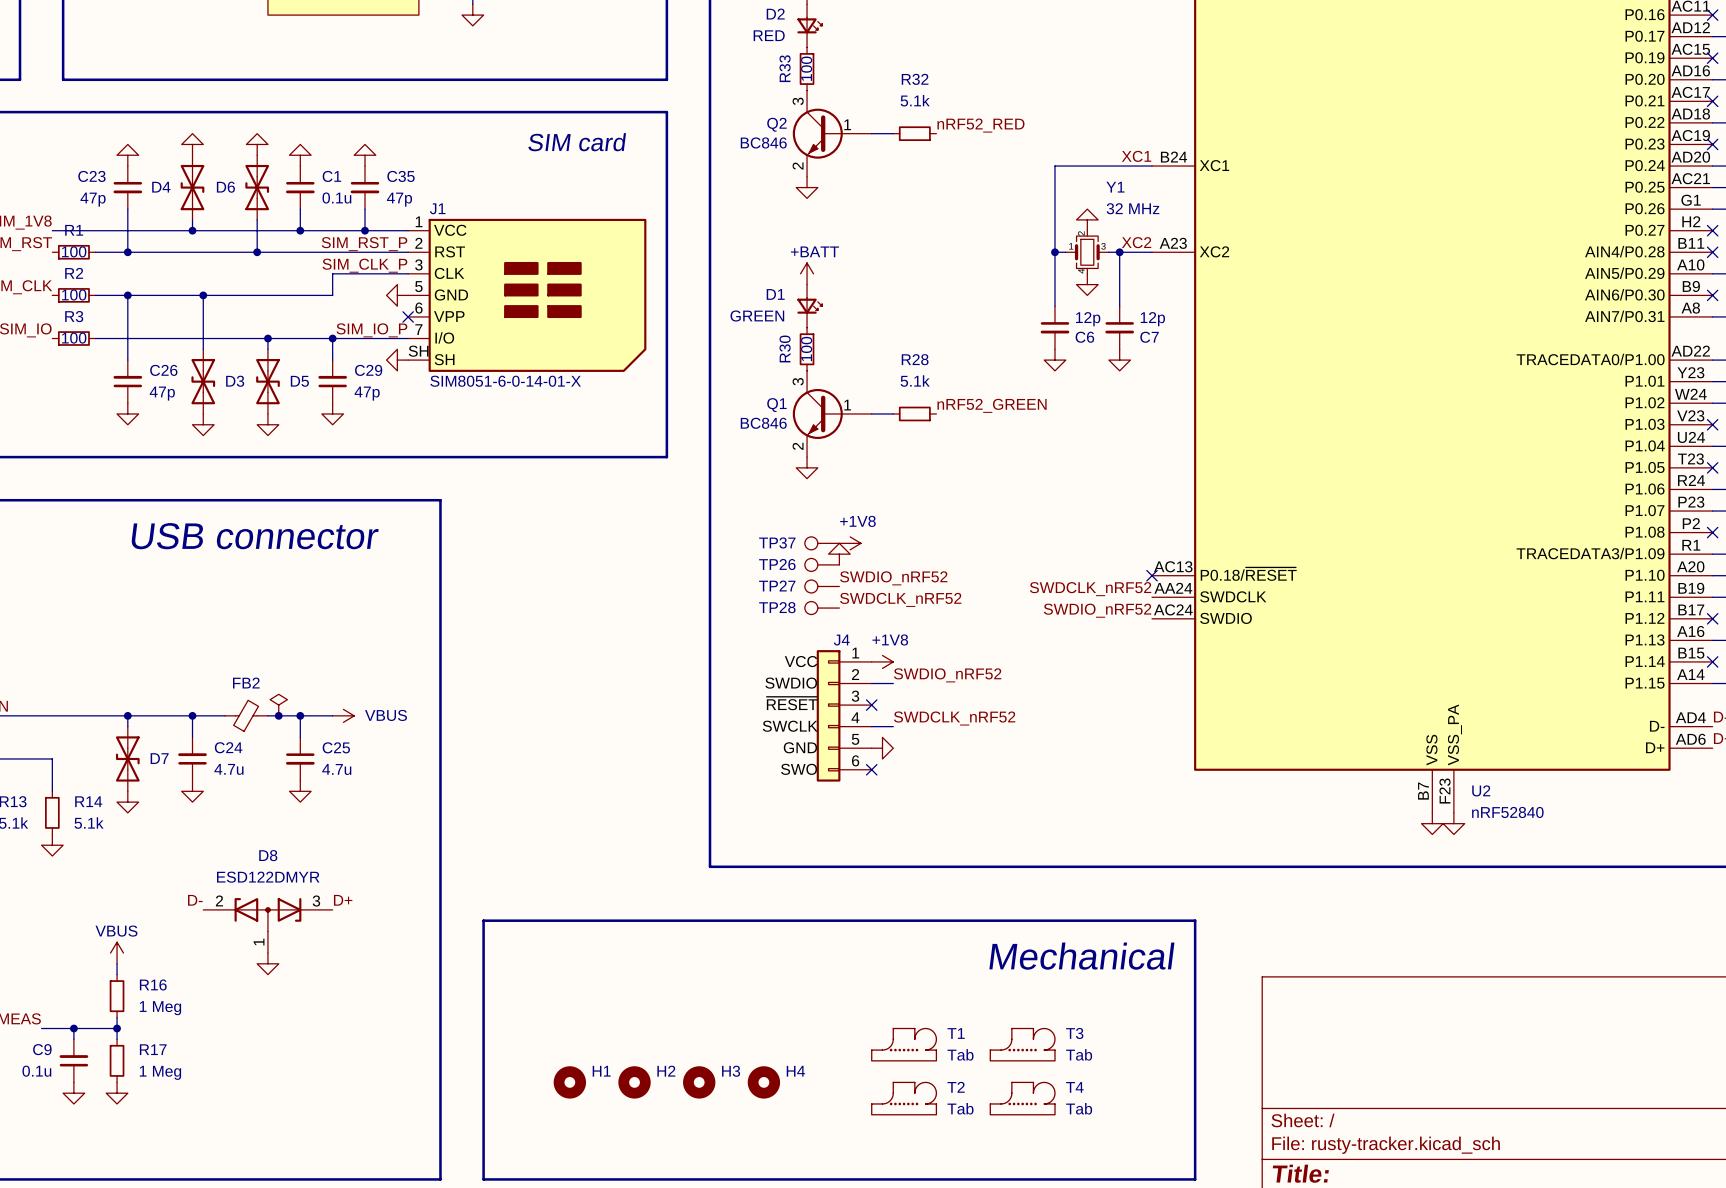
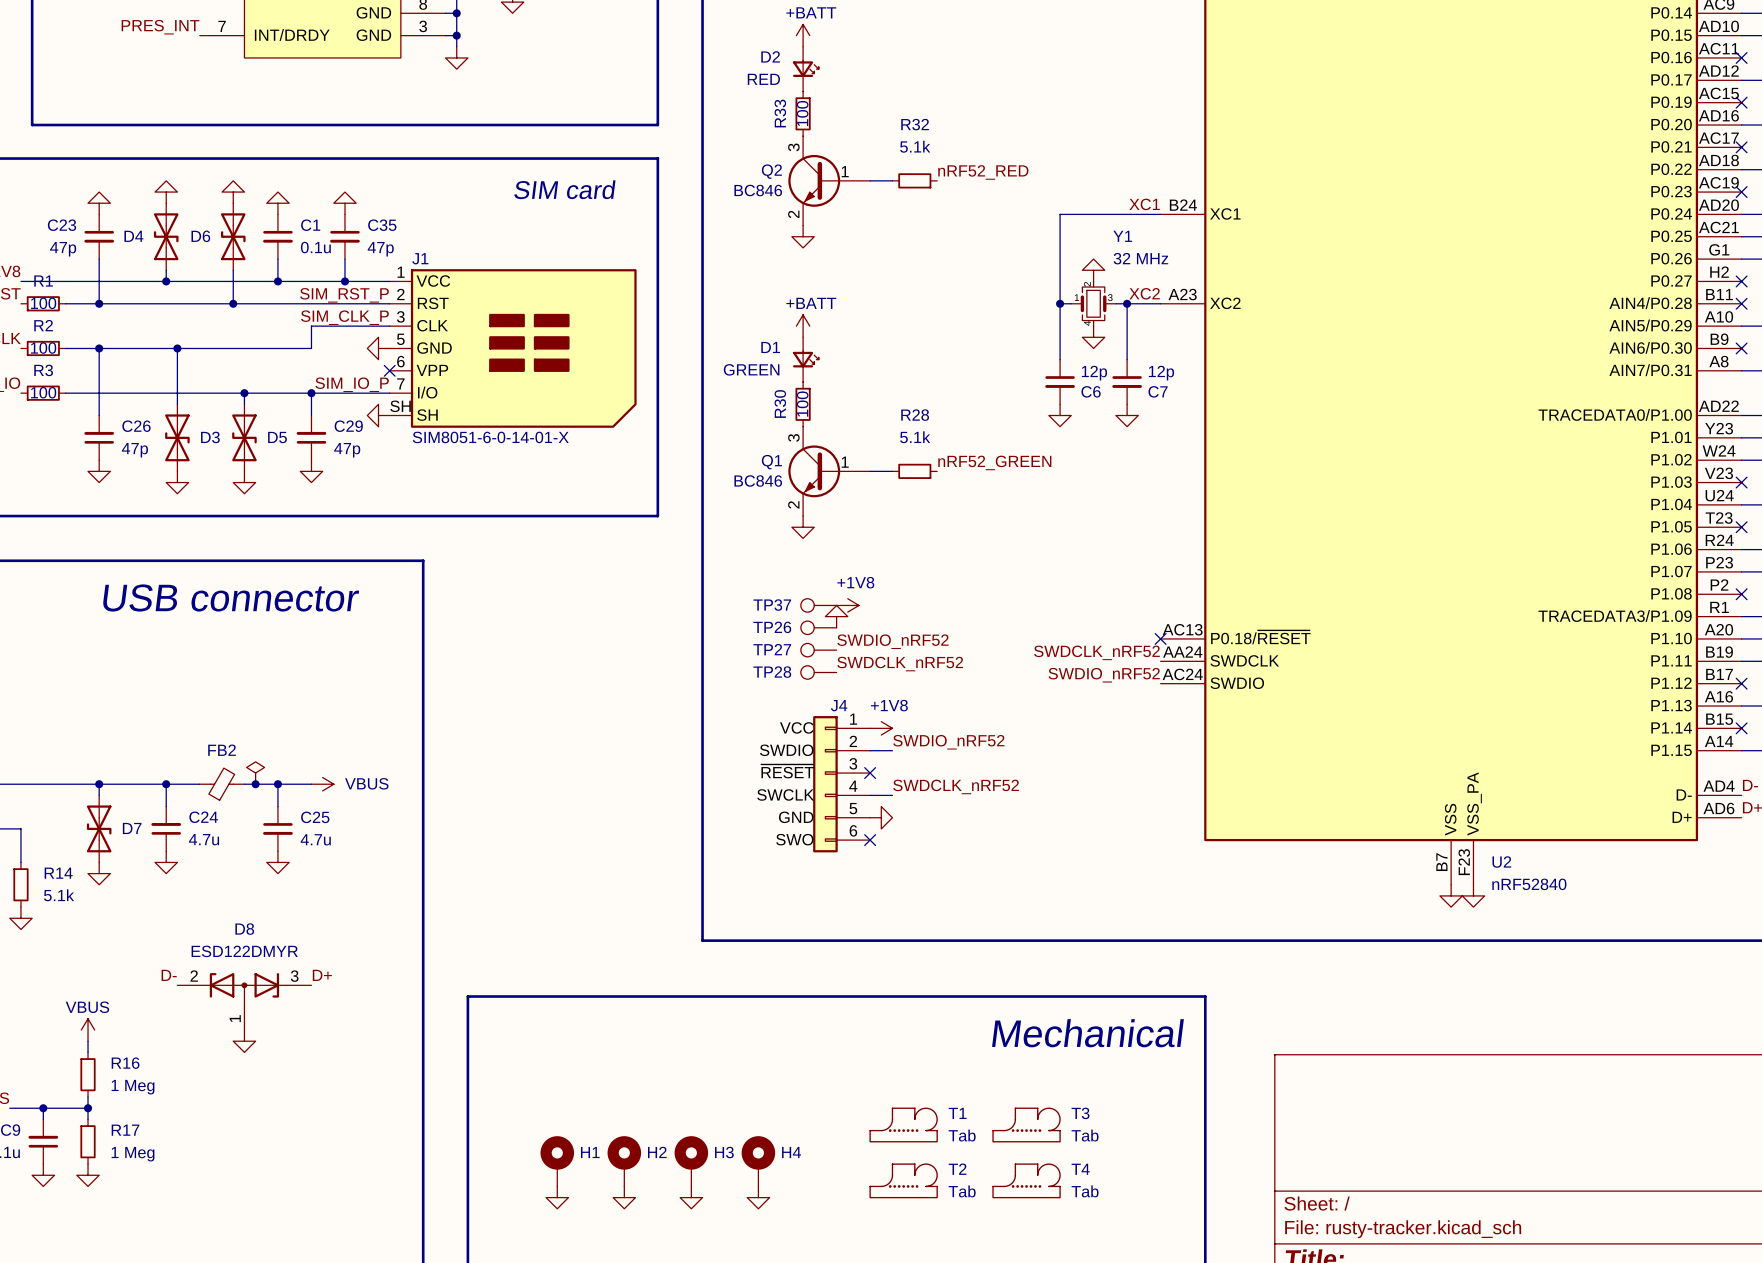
H1 symbol: [553, 1066, 587, 1099] -> [540, 1136, 575, 1187]
H2 symbol: [618, 1066, 651, 1099] -> [607, 1136, 642, 1187]
H3 symbol: [683, 1066, 716, 1099] -> [674, 1136, 709, 1187]
H4 symbol: [747, 1066, 781, 1099] -> [741, 1136, 776, 1187]
power symbol: none -> (557, 1197)
power symbol: none -> (624, 1197)
power symbol: none -> (691, 1197)
power symbol: none -> (758, 1197)

